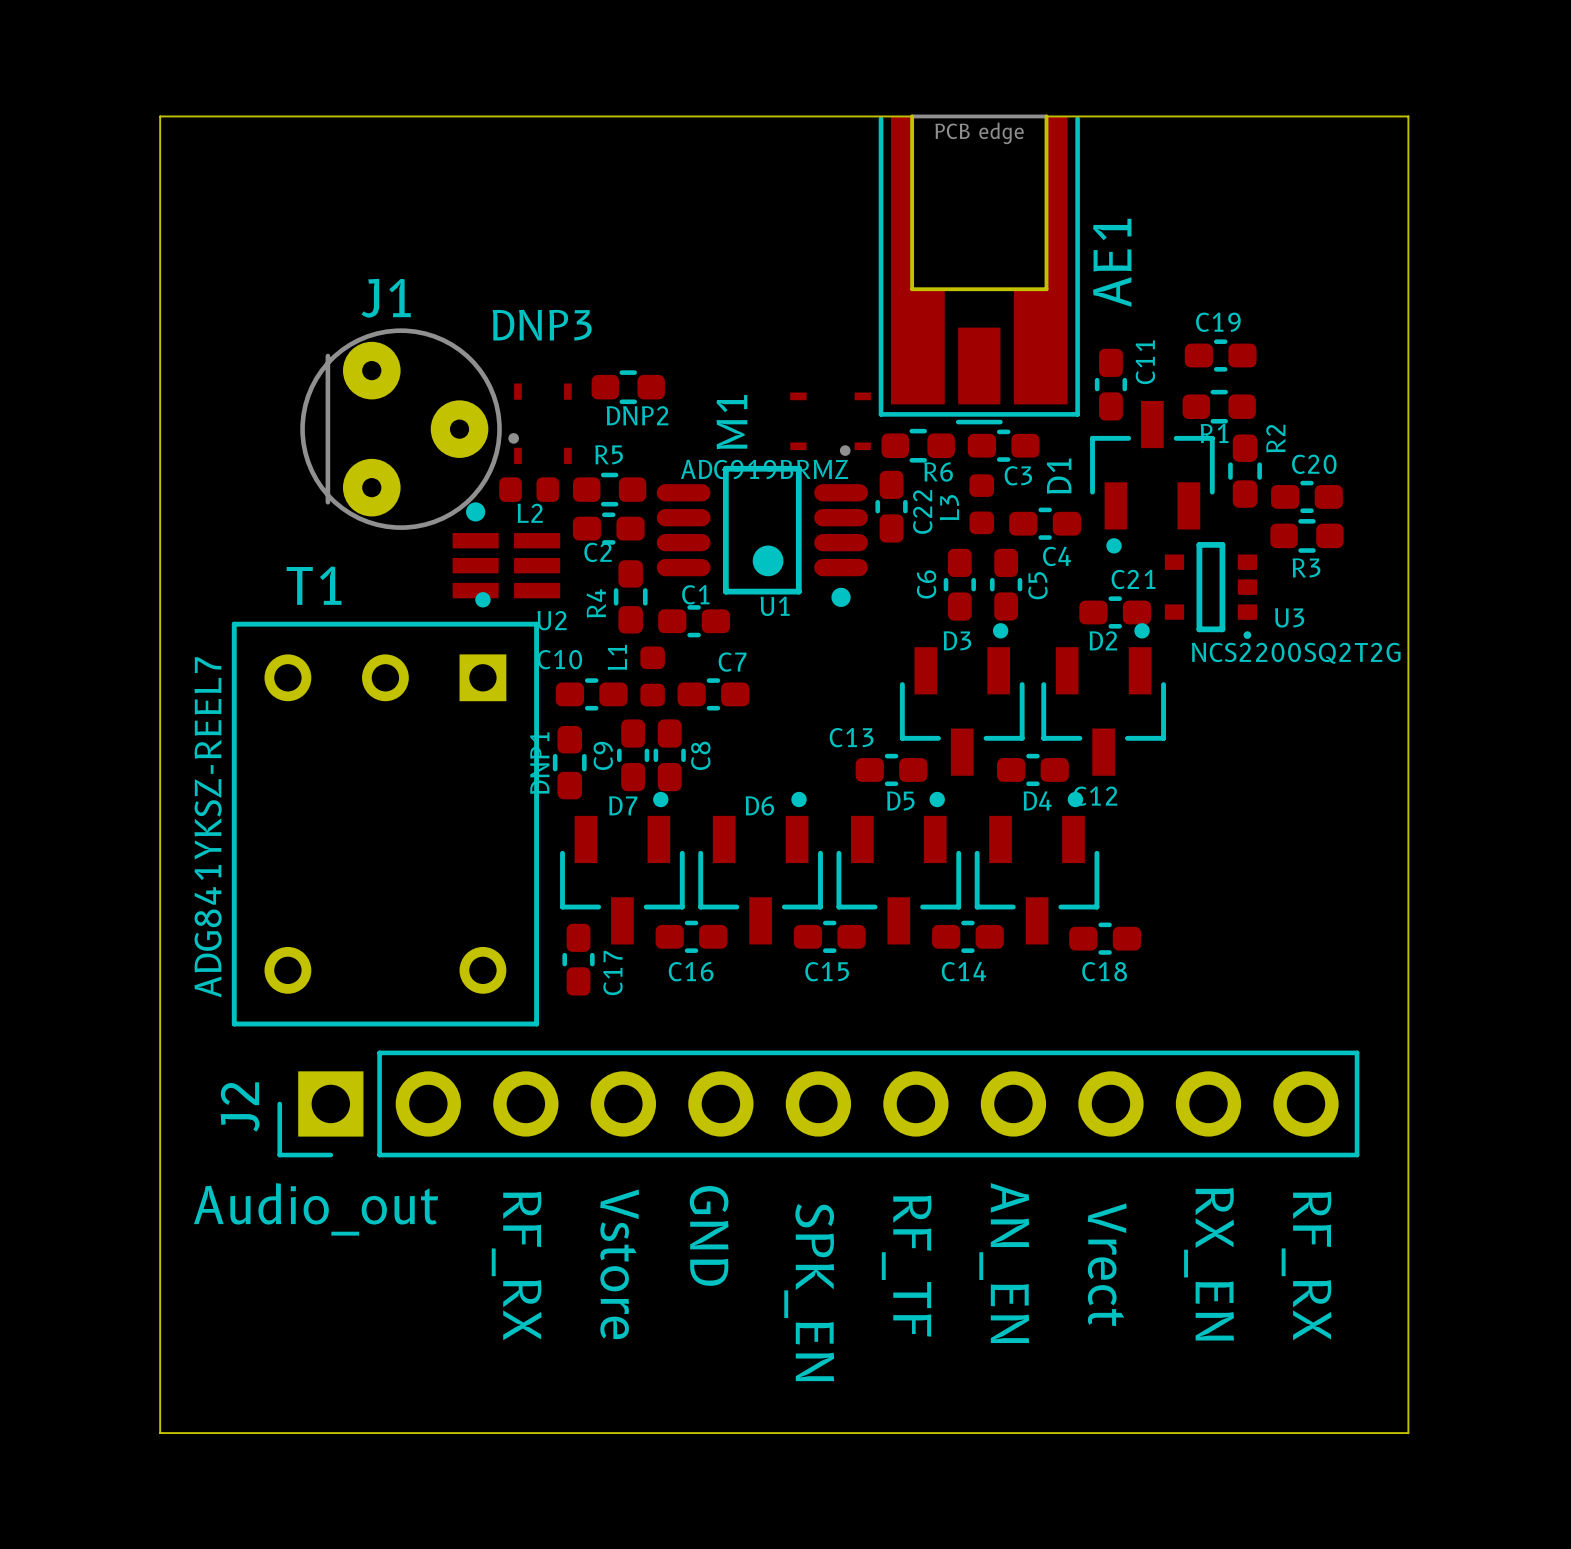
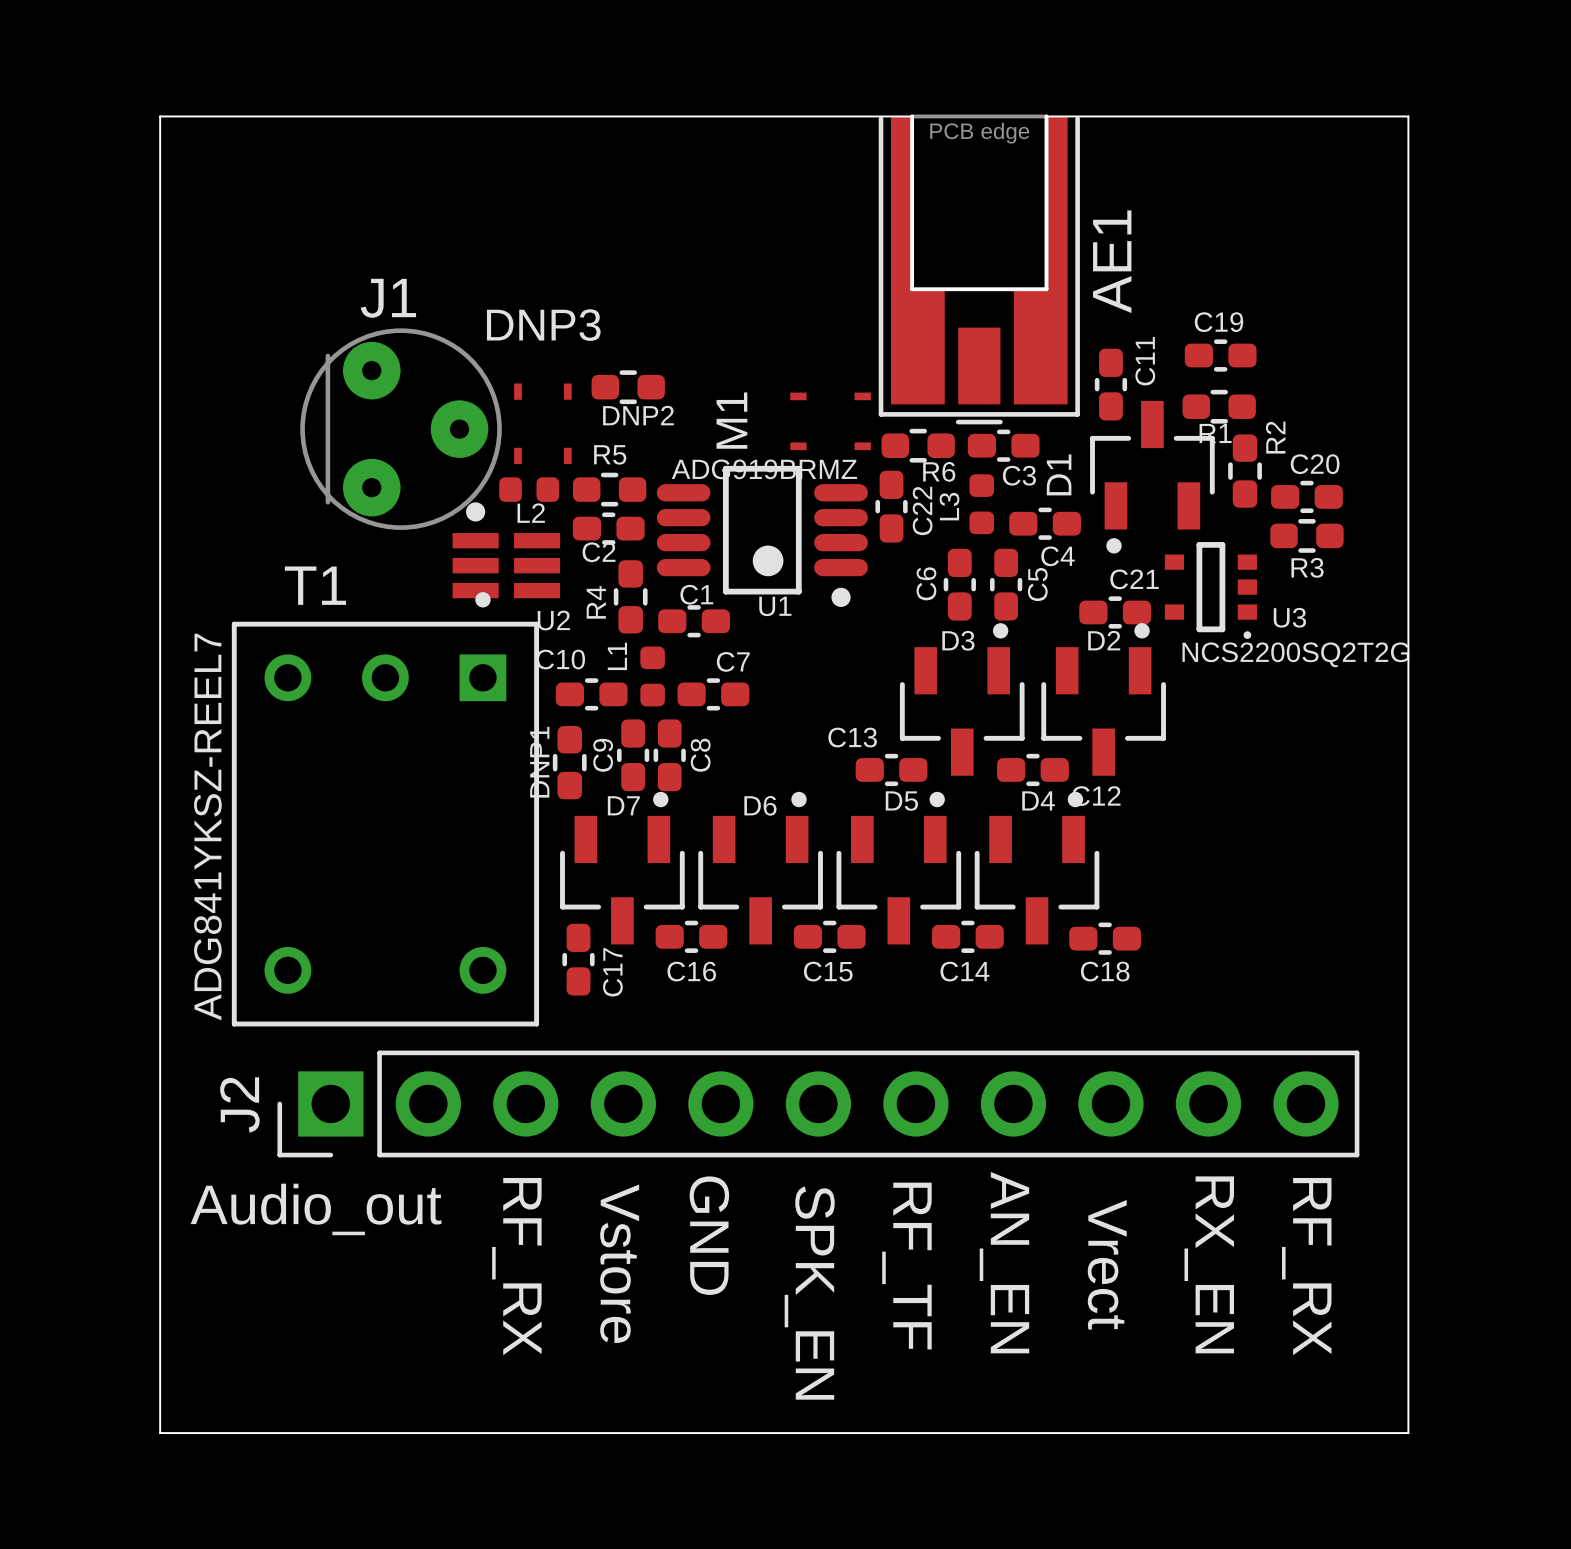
drawing: [508, 433, 519, 444] -> none
drawing: [839, 445, 851, 456] -> none

